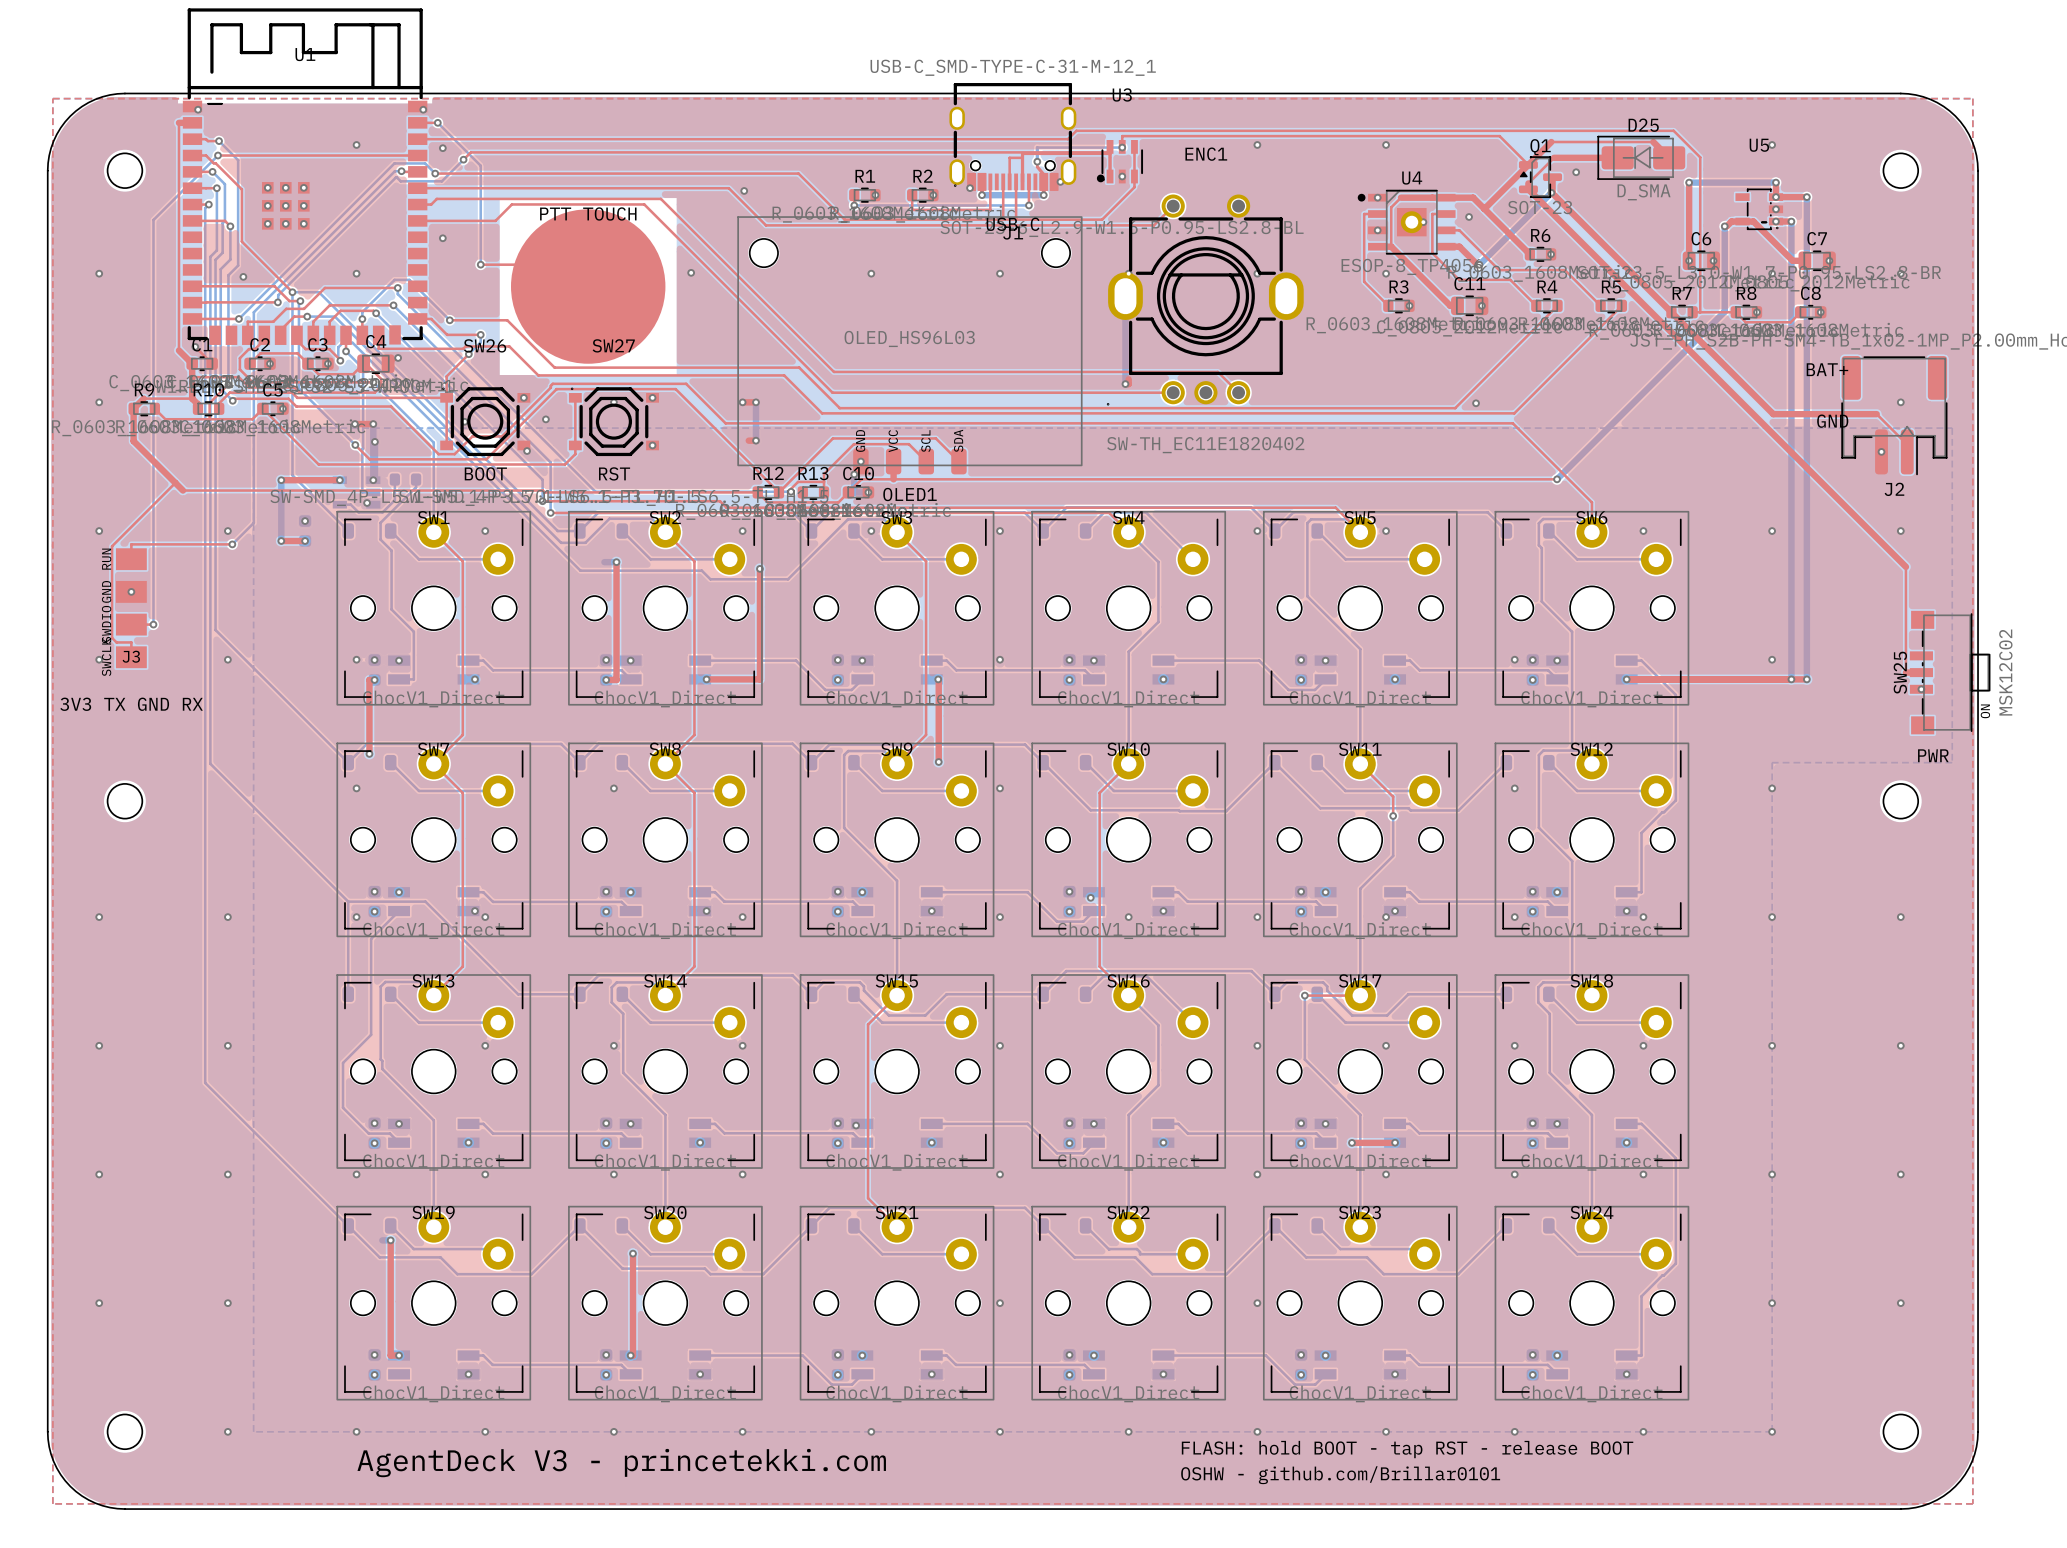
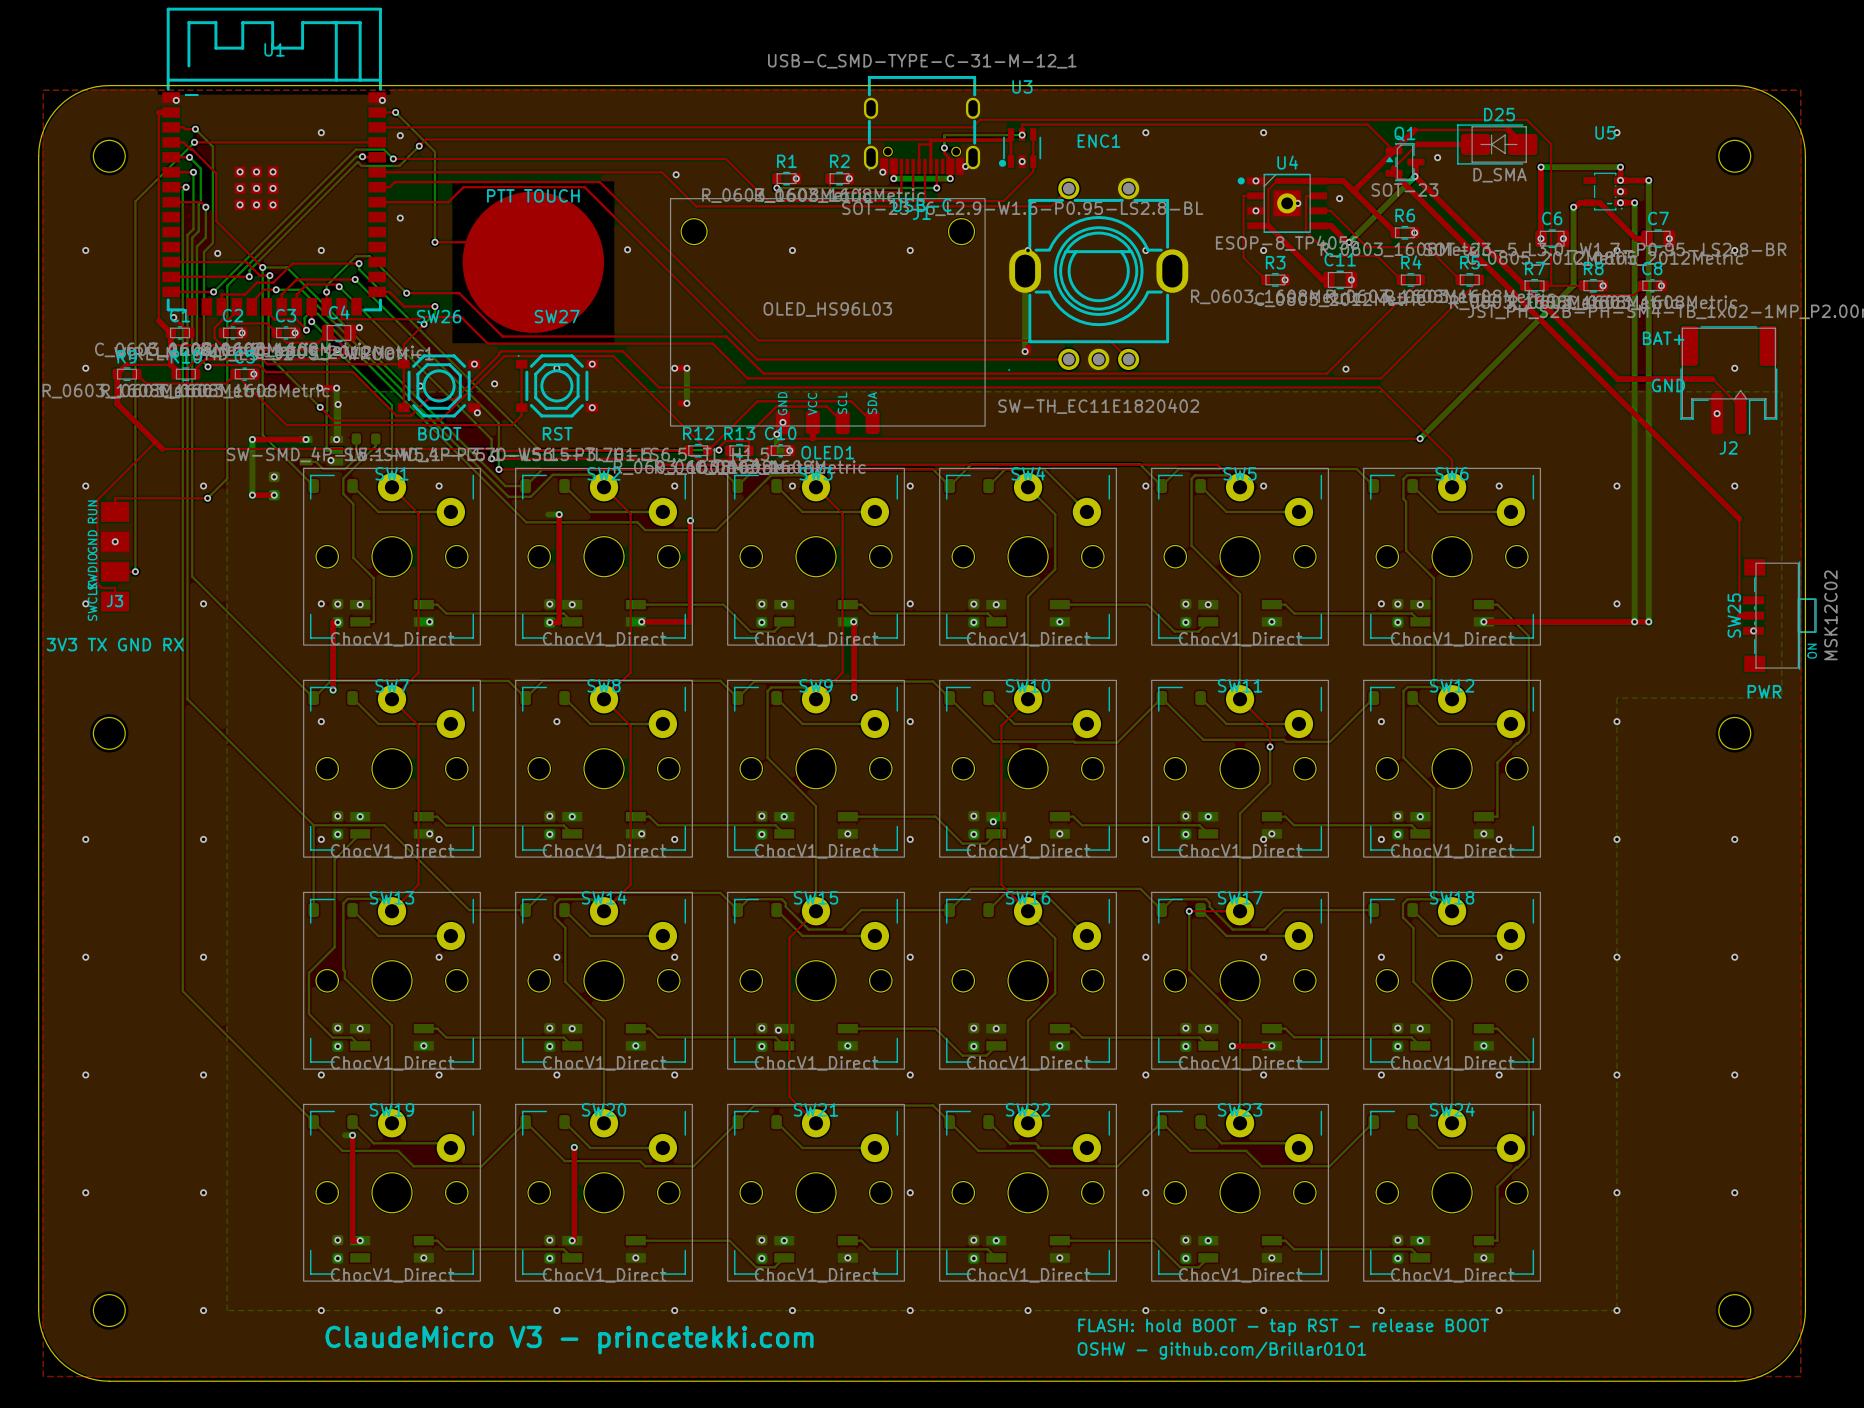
text: AgentDeck V3 - princetekki.com (621, 1463) -> ClaudeMicro V3 - princetekki.com (569, 1340)

